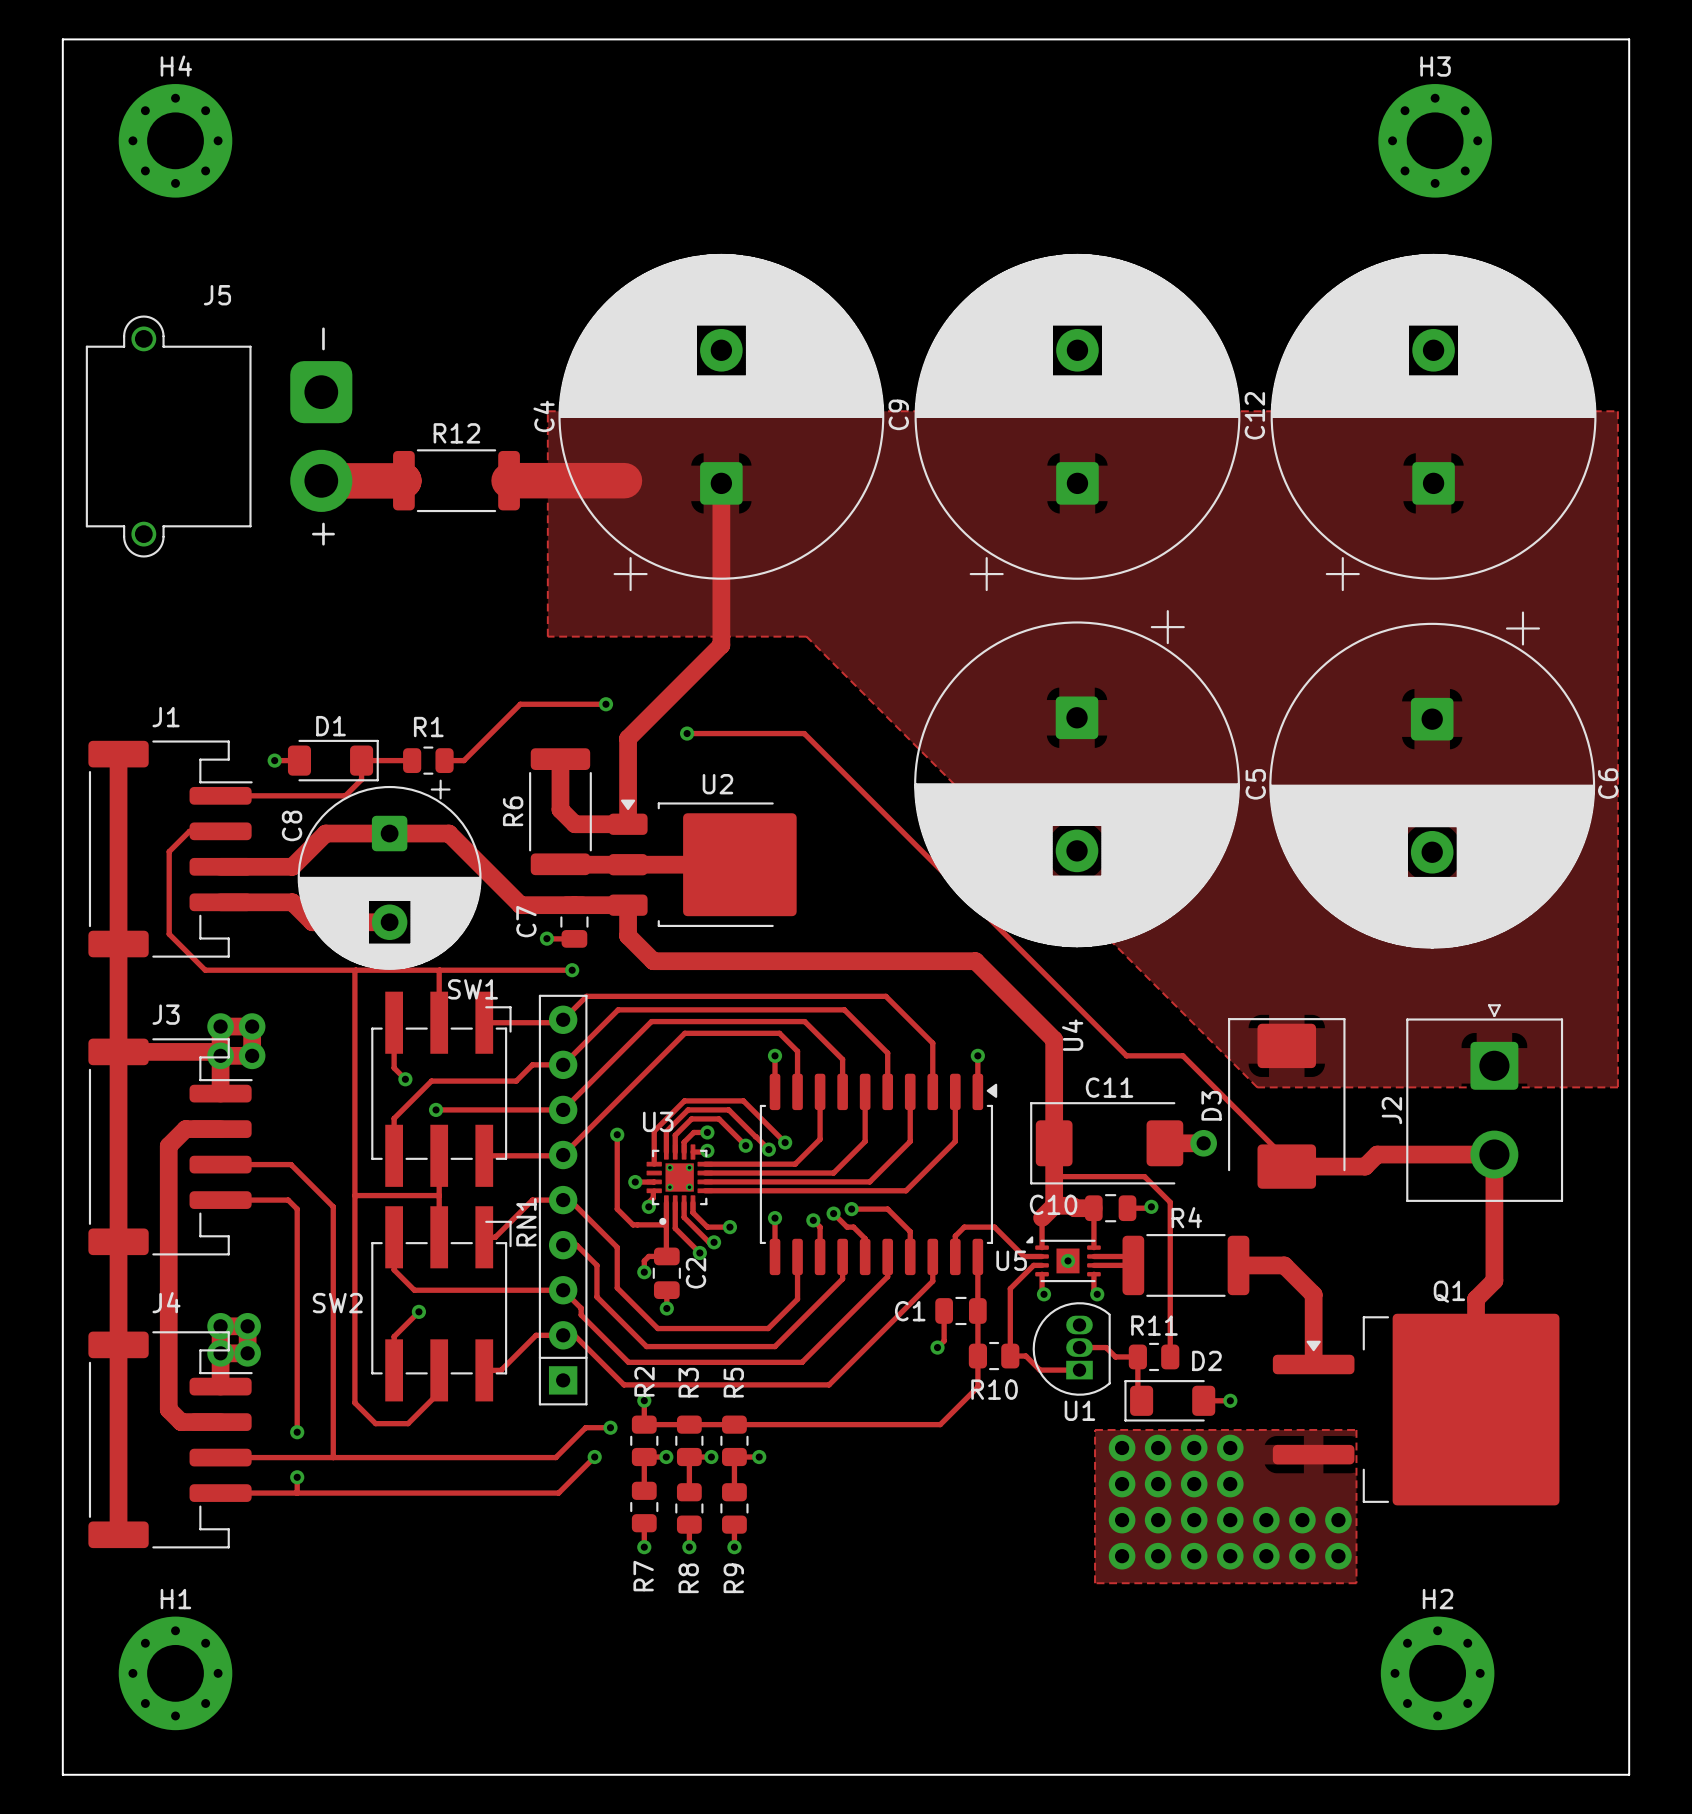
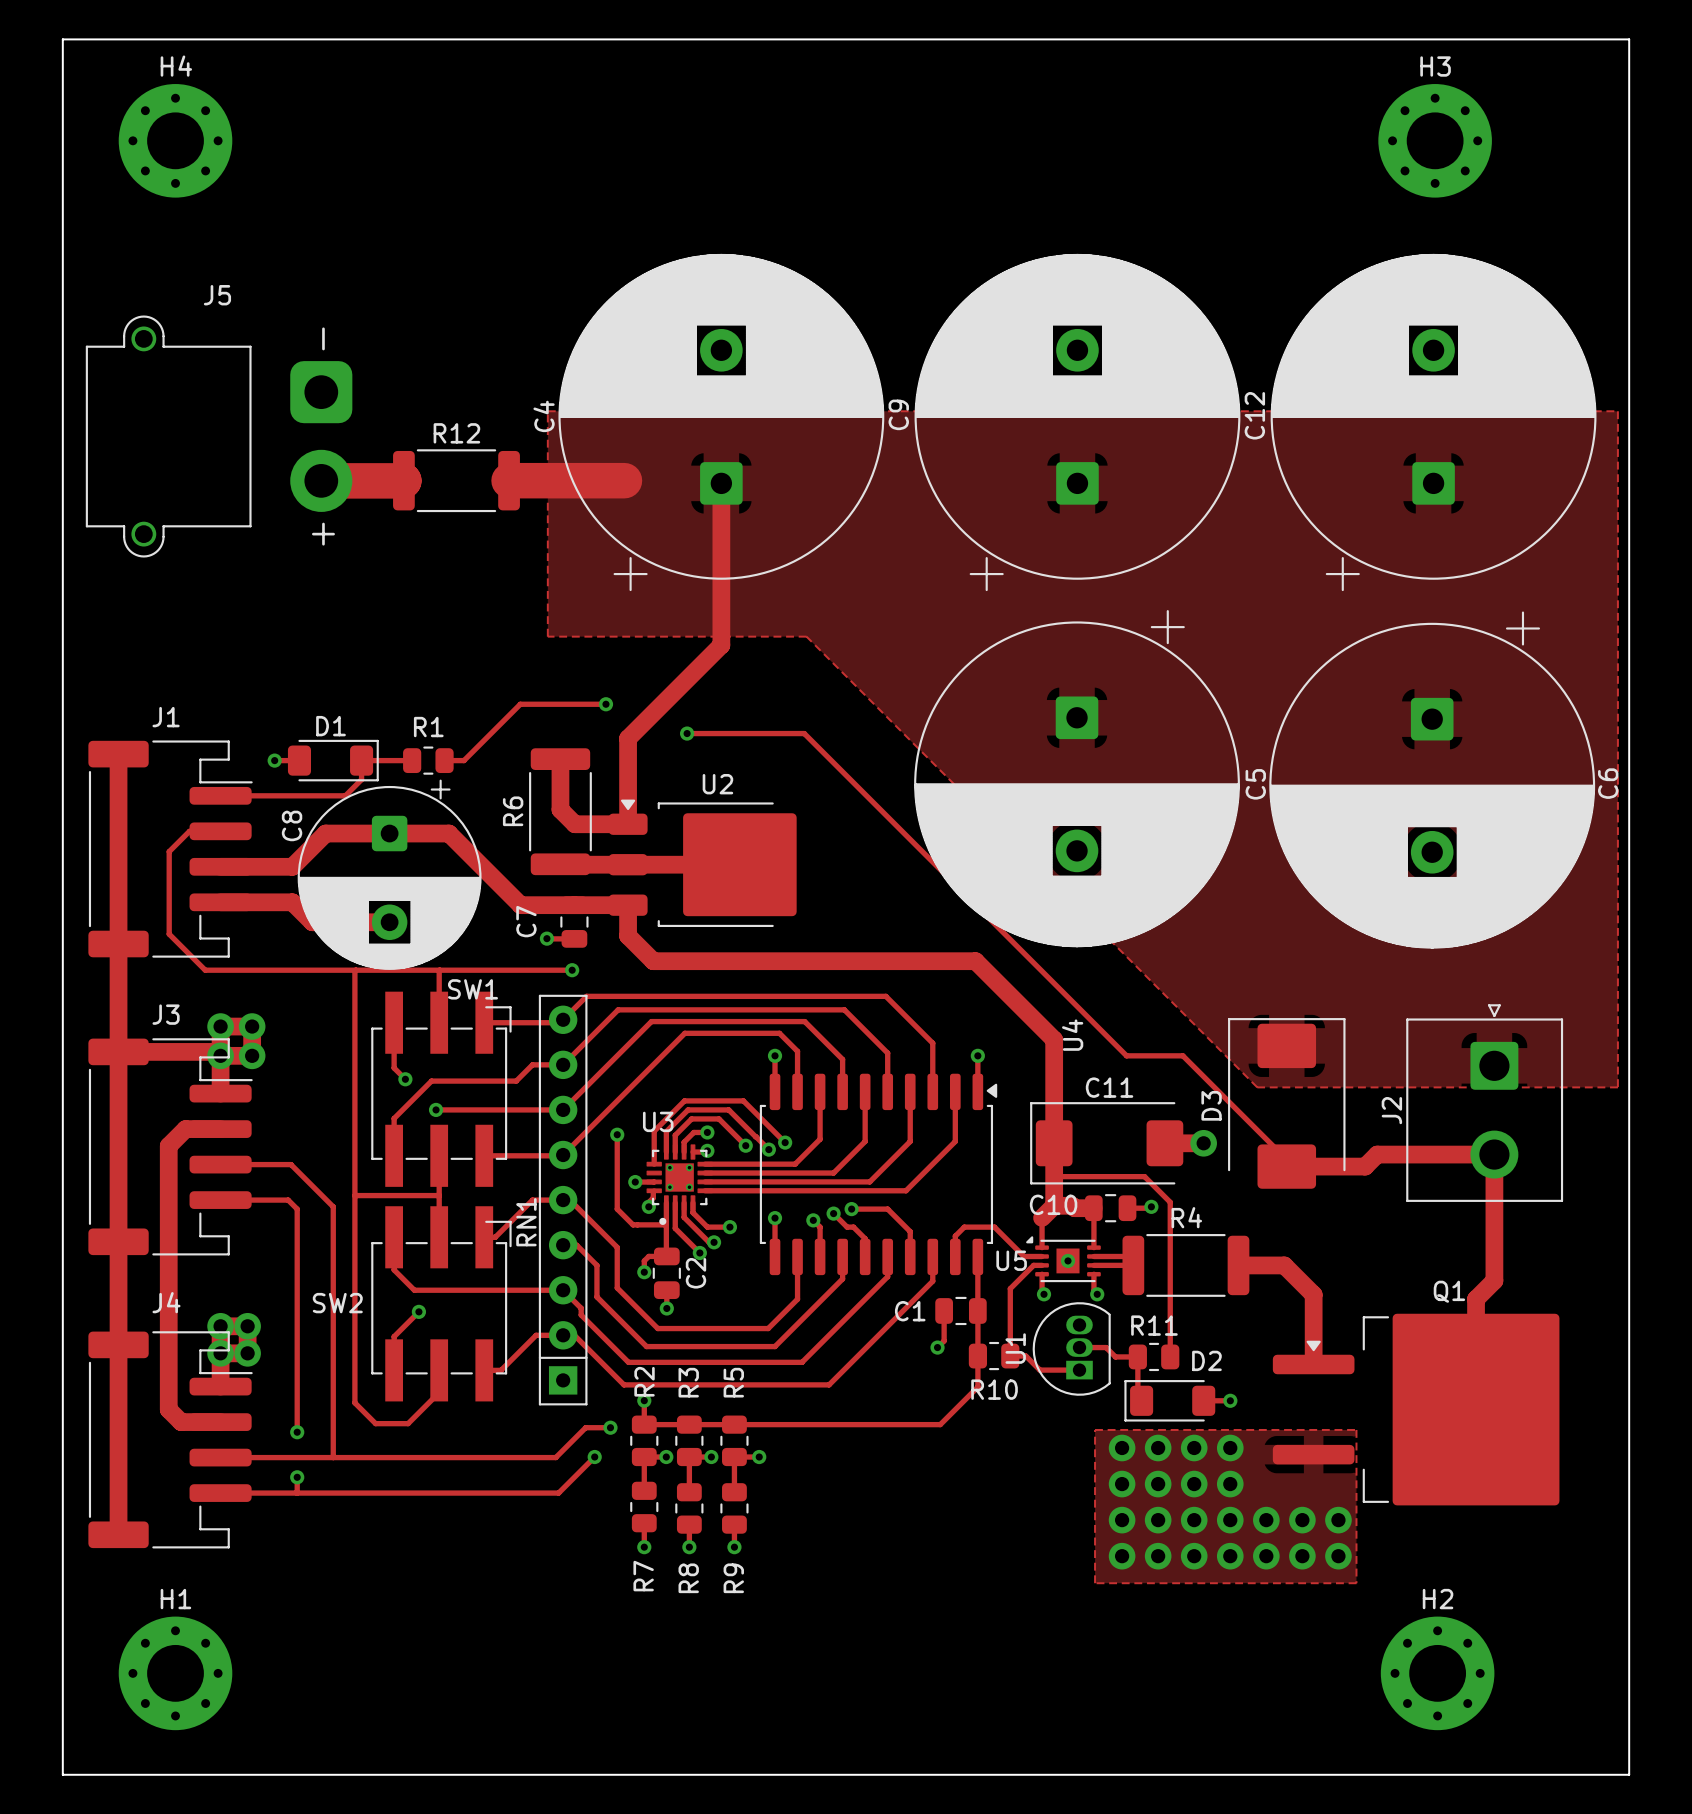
U1 name rotation: 0° (1079, 1410) -> 90° counterclockwise (1015, 1348)
U1 name position: U1 (1079, 1410) -> U1 (1015, 1348)

